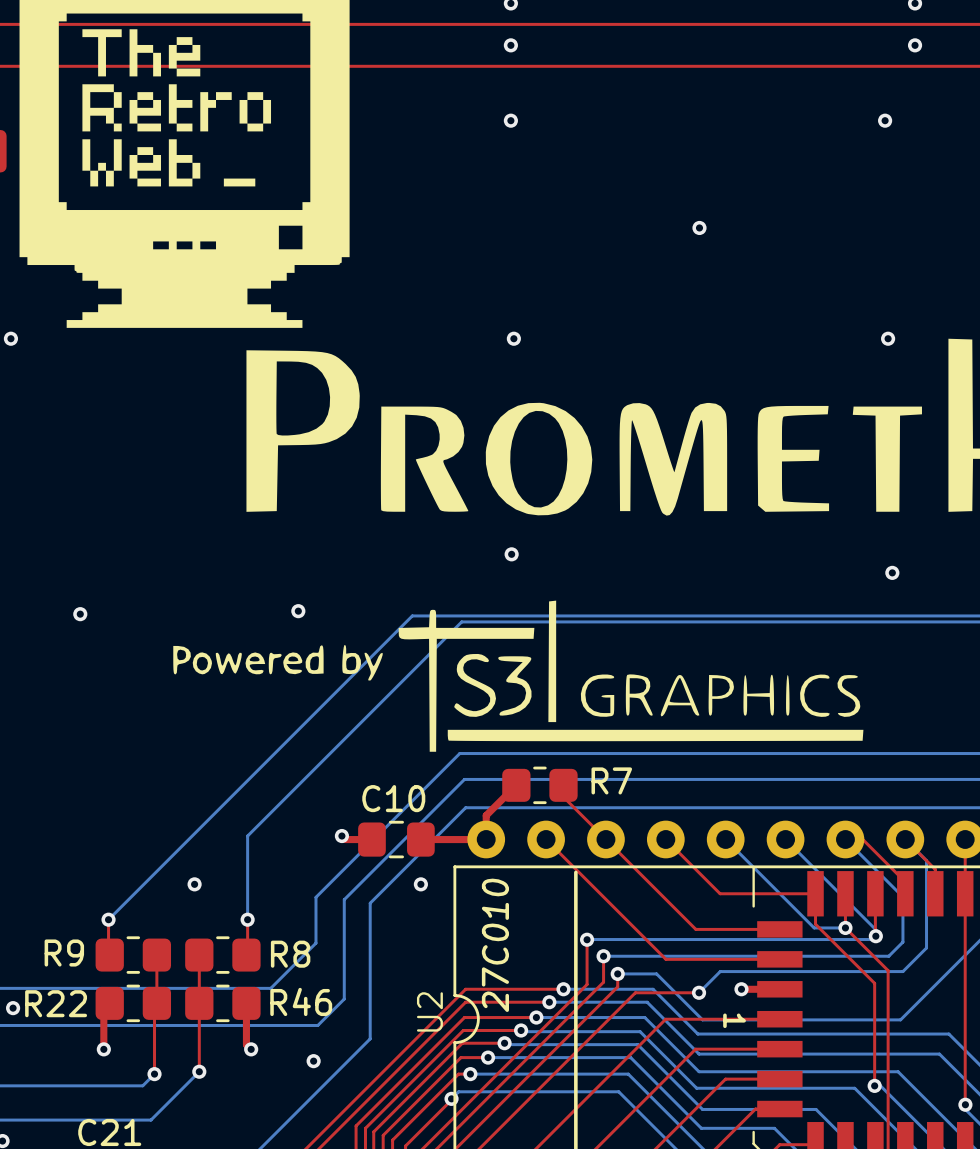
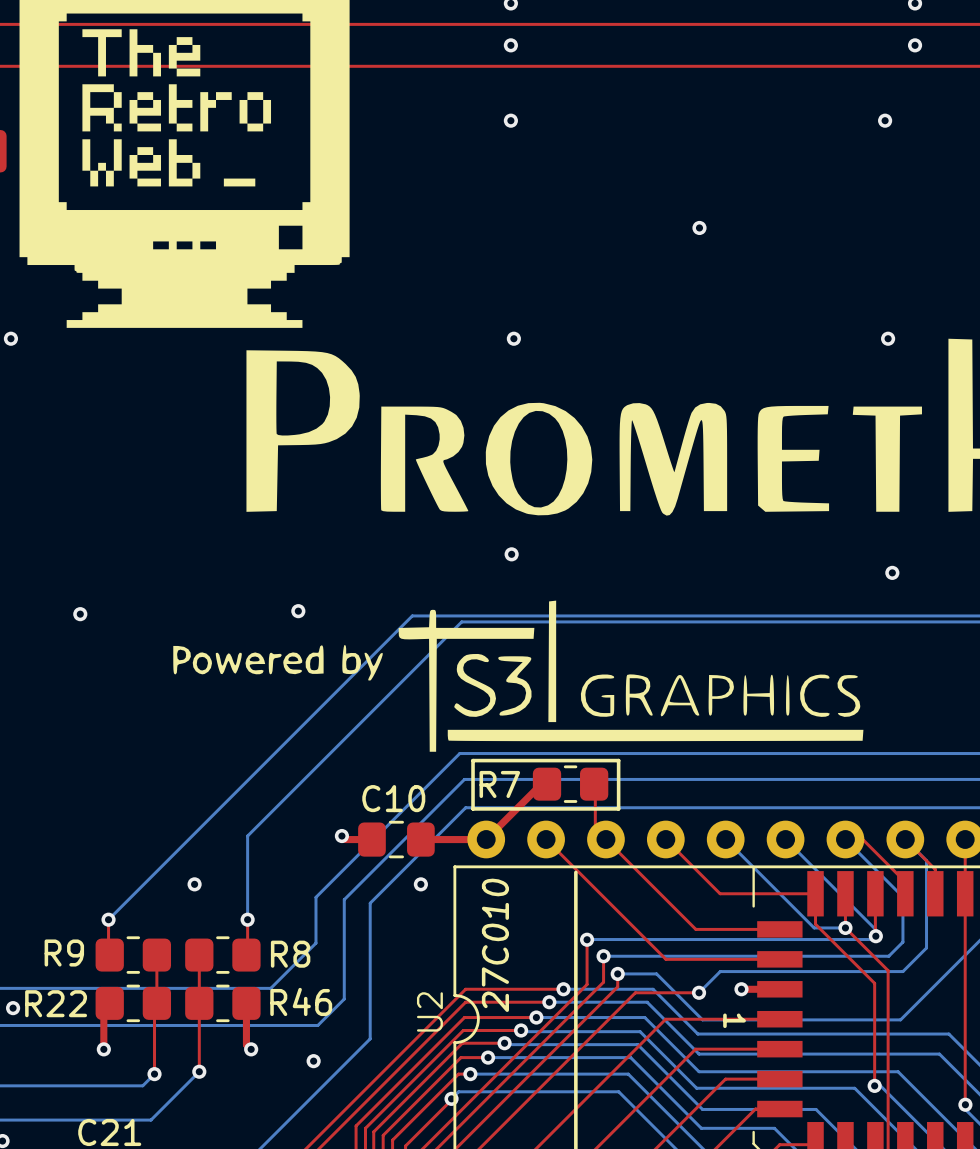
line: none -> (473, 760) (618, 760) (618, 808) (473, 808) (473, 760)
R7 name position: R7 (611, 780) -> R7 (499, 784)
top track: (516, 785) (486, 815) (486, 839) -> (547, 784) (541, 784) (486, 839)
R7 position: (539, 785) -> (570, 784)
top track: (563, 785) (563, 797) (595, 828) -> (594, 784) (595, 828)

